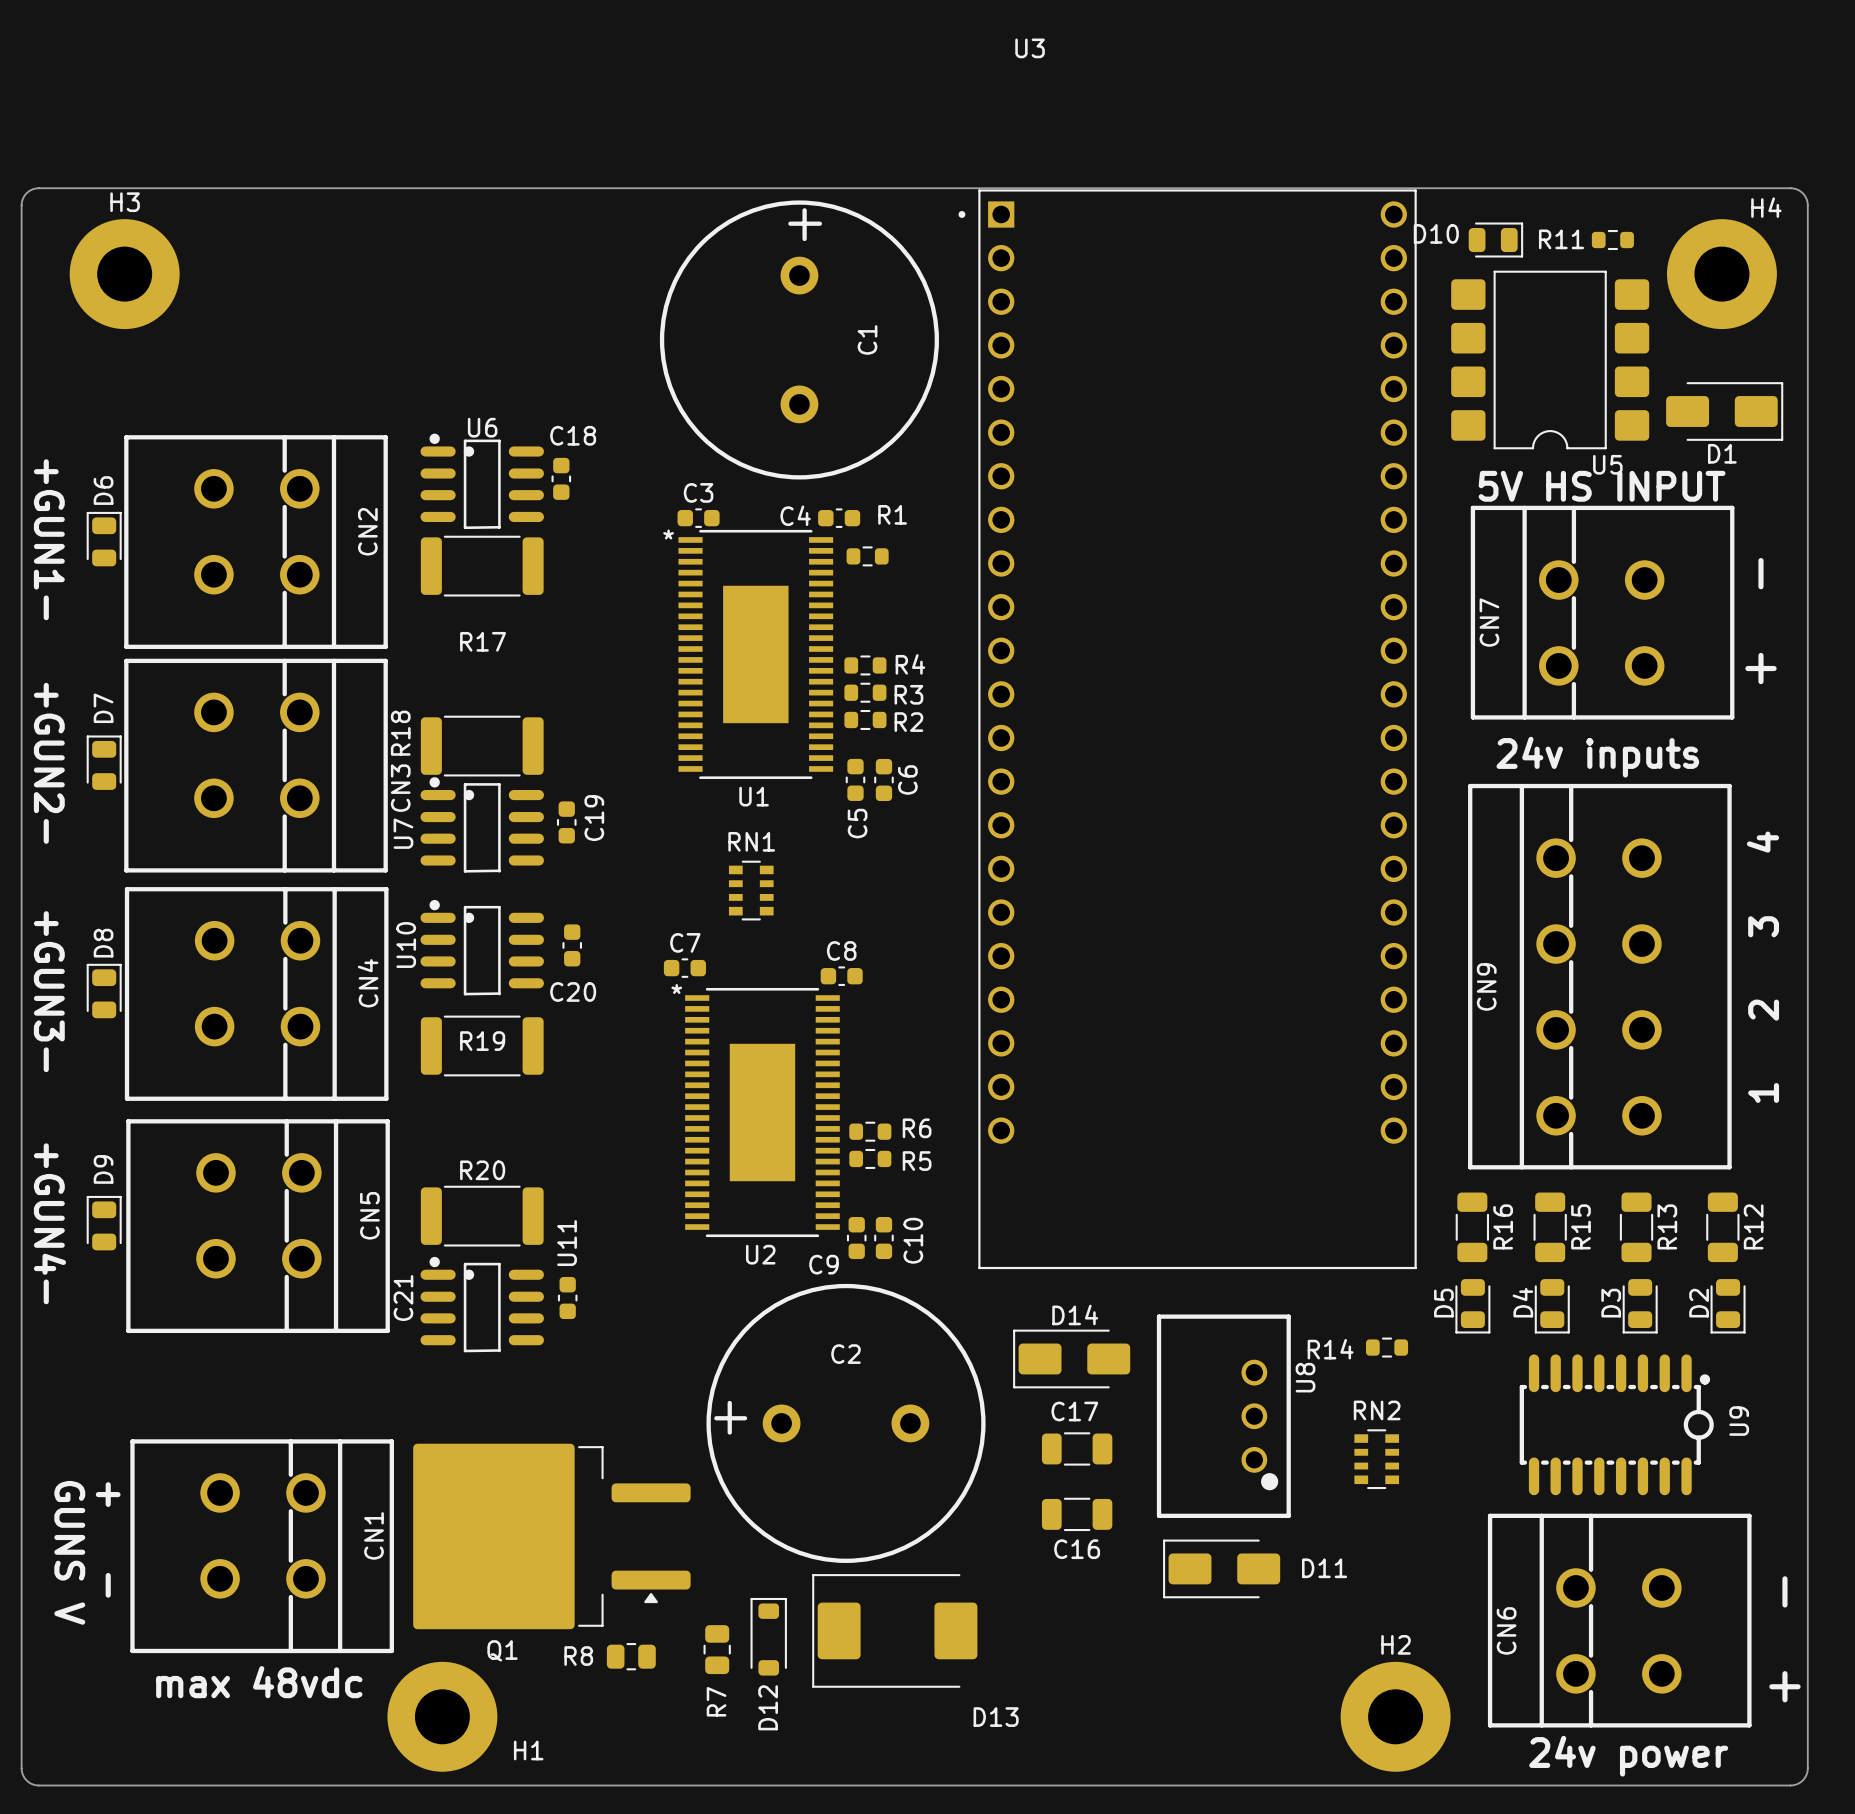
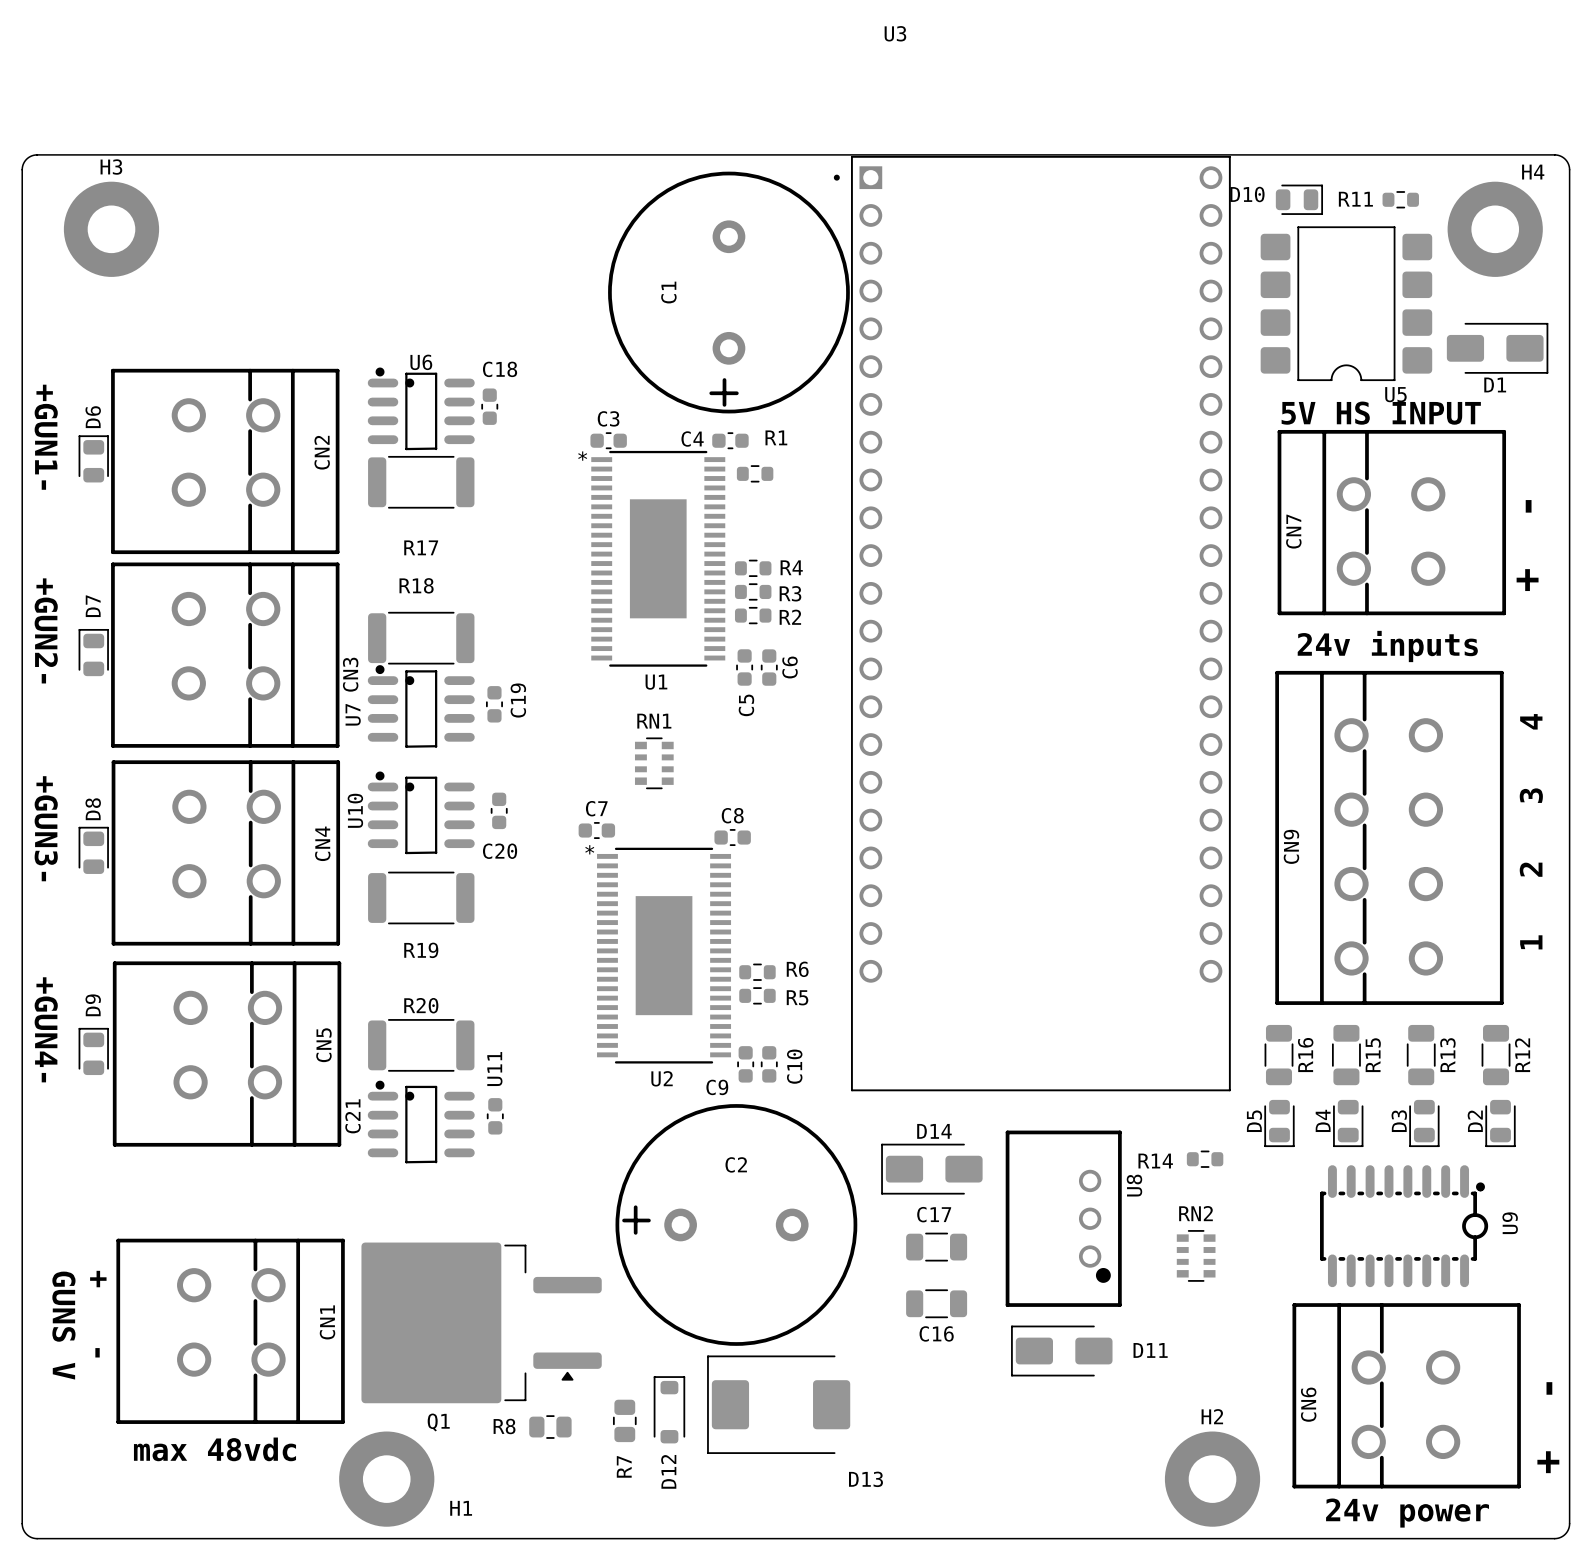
C1 rotation: 0° (799, 339) -> 180° (728, 292)
R18 name rotation: 0° (400, 733) -> 90° clockwise (416, 585)
R18 name position: R18 (400, 733) -> R18 (416, 585)
R19 name position: R19 (482, 1041) -> R19 (421, 950)

